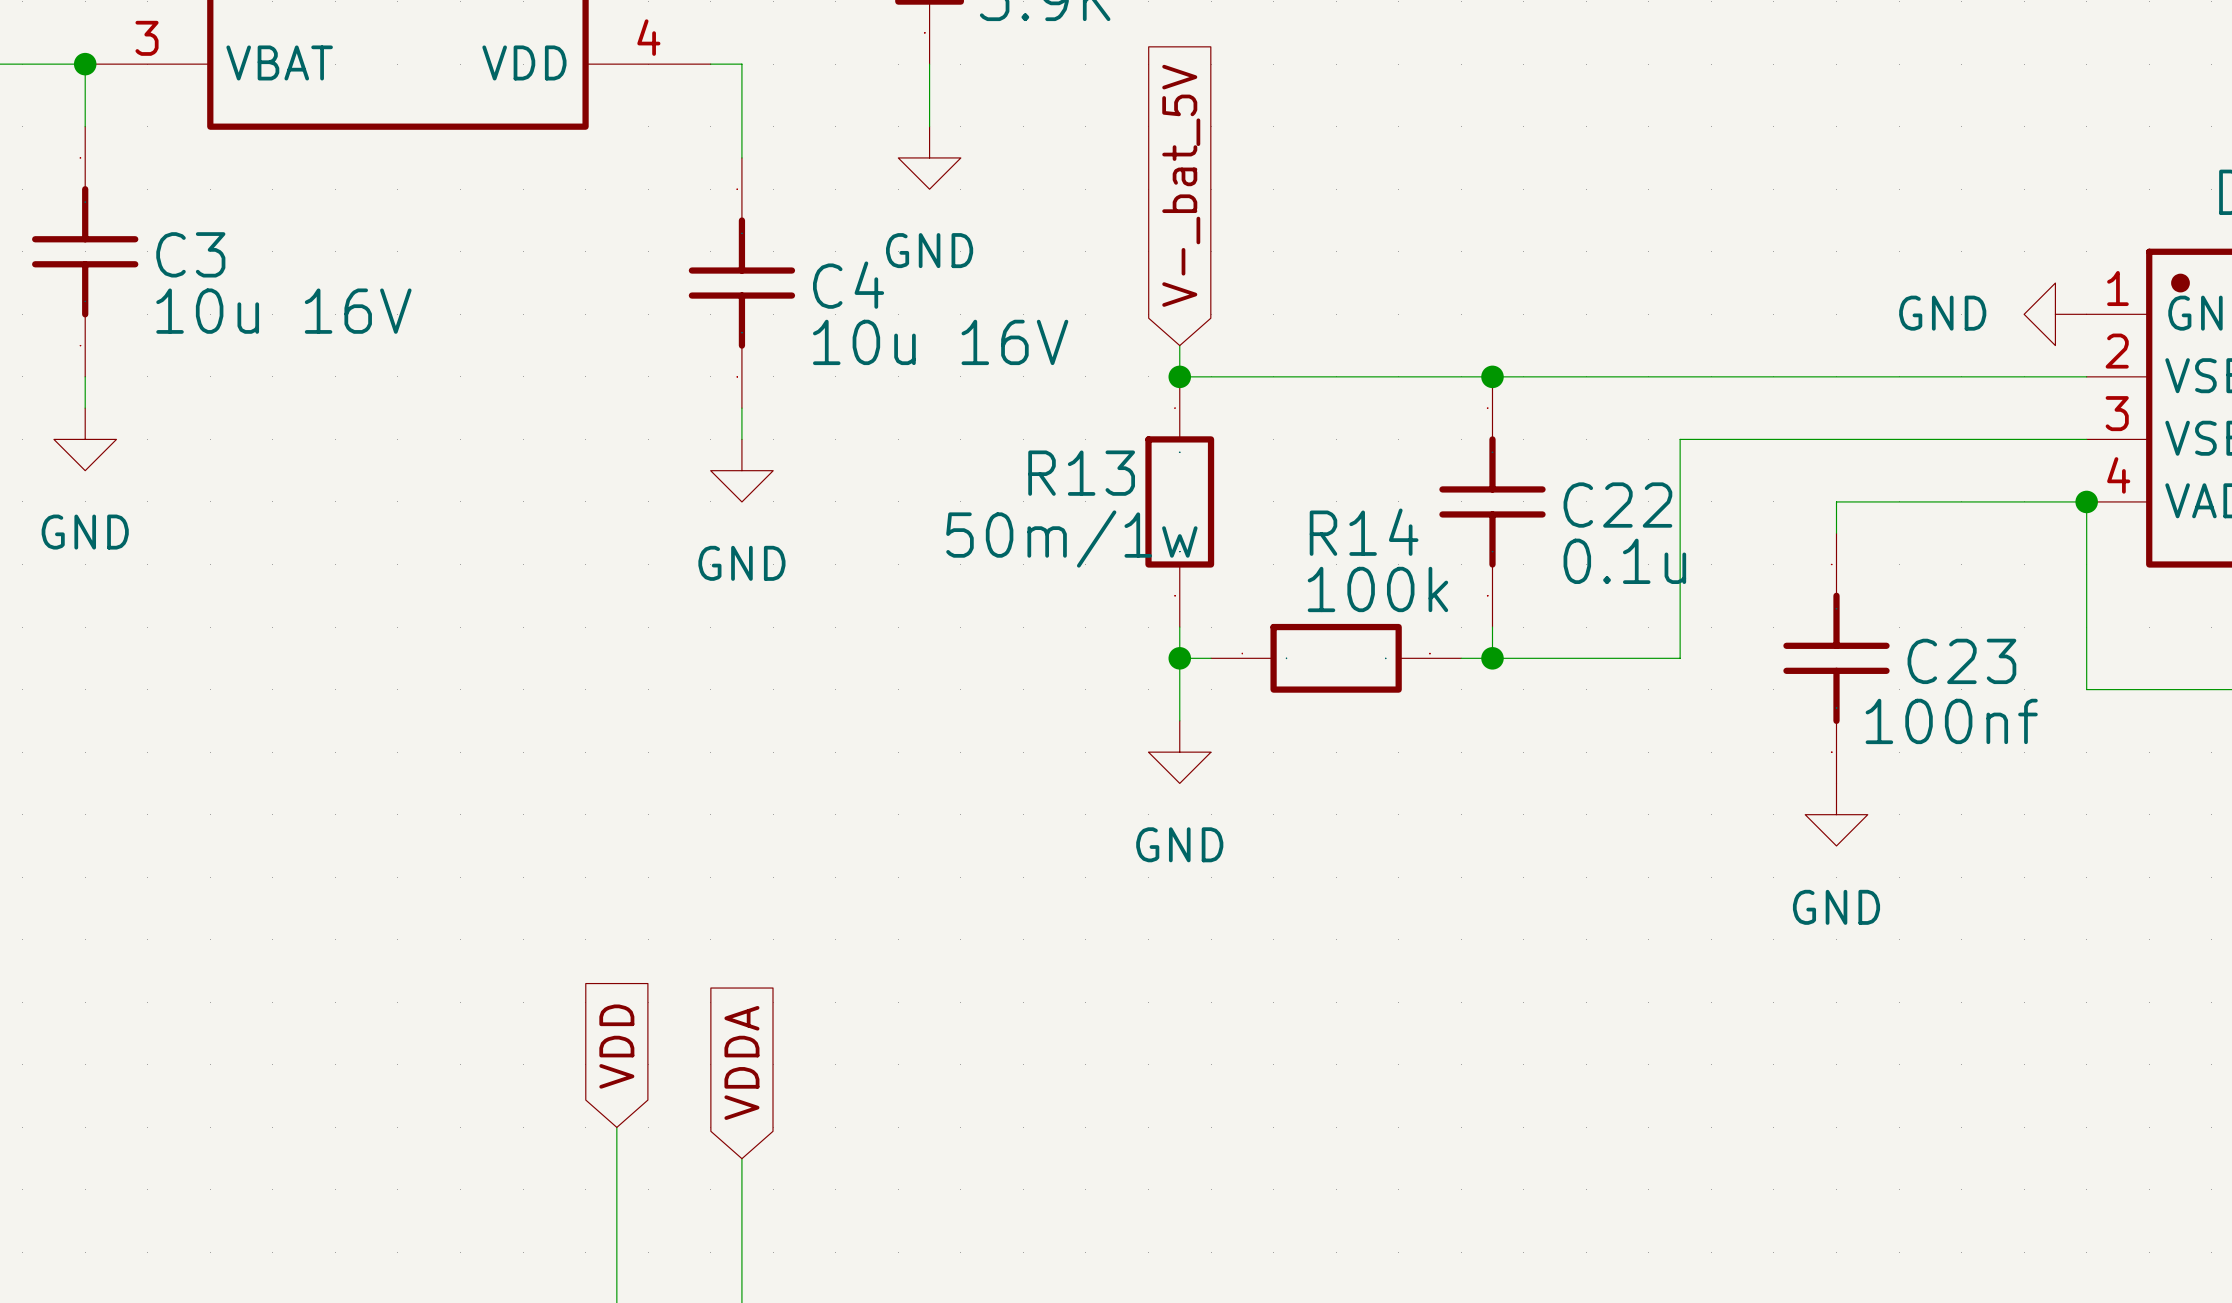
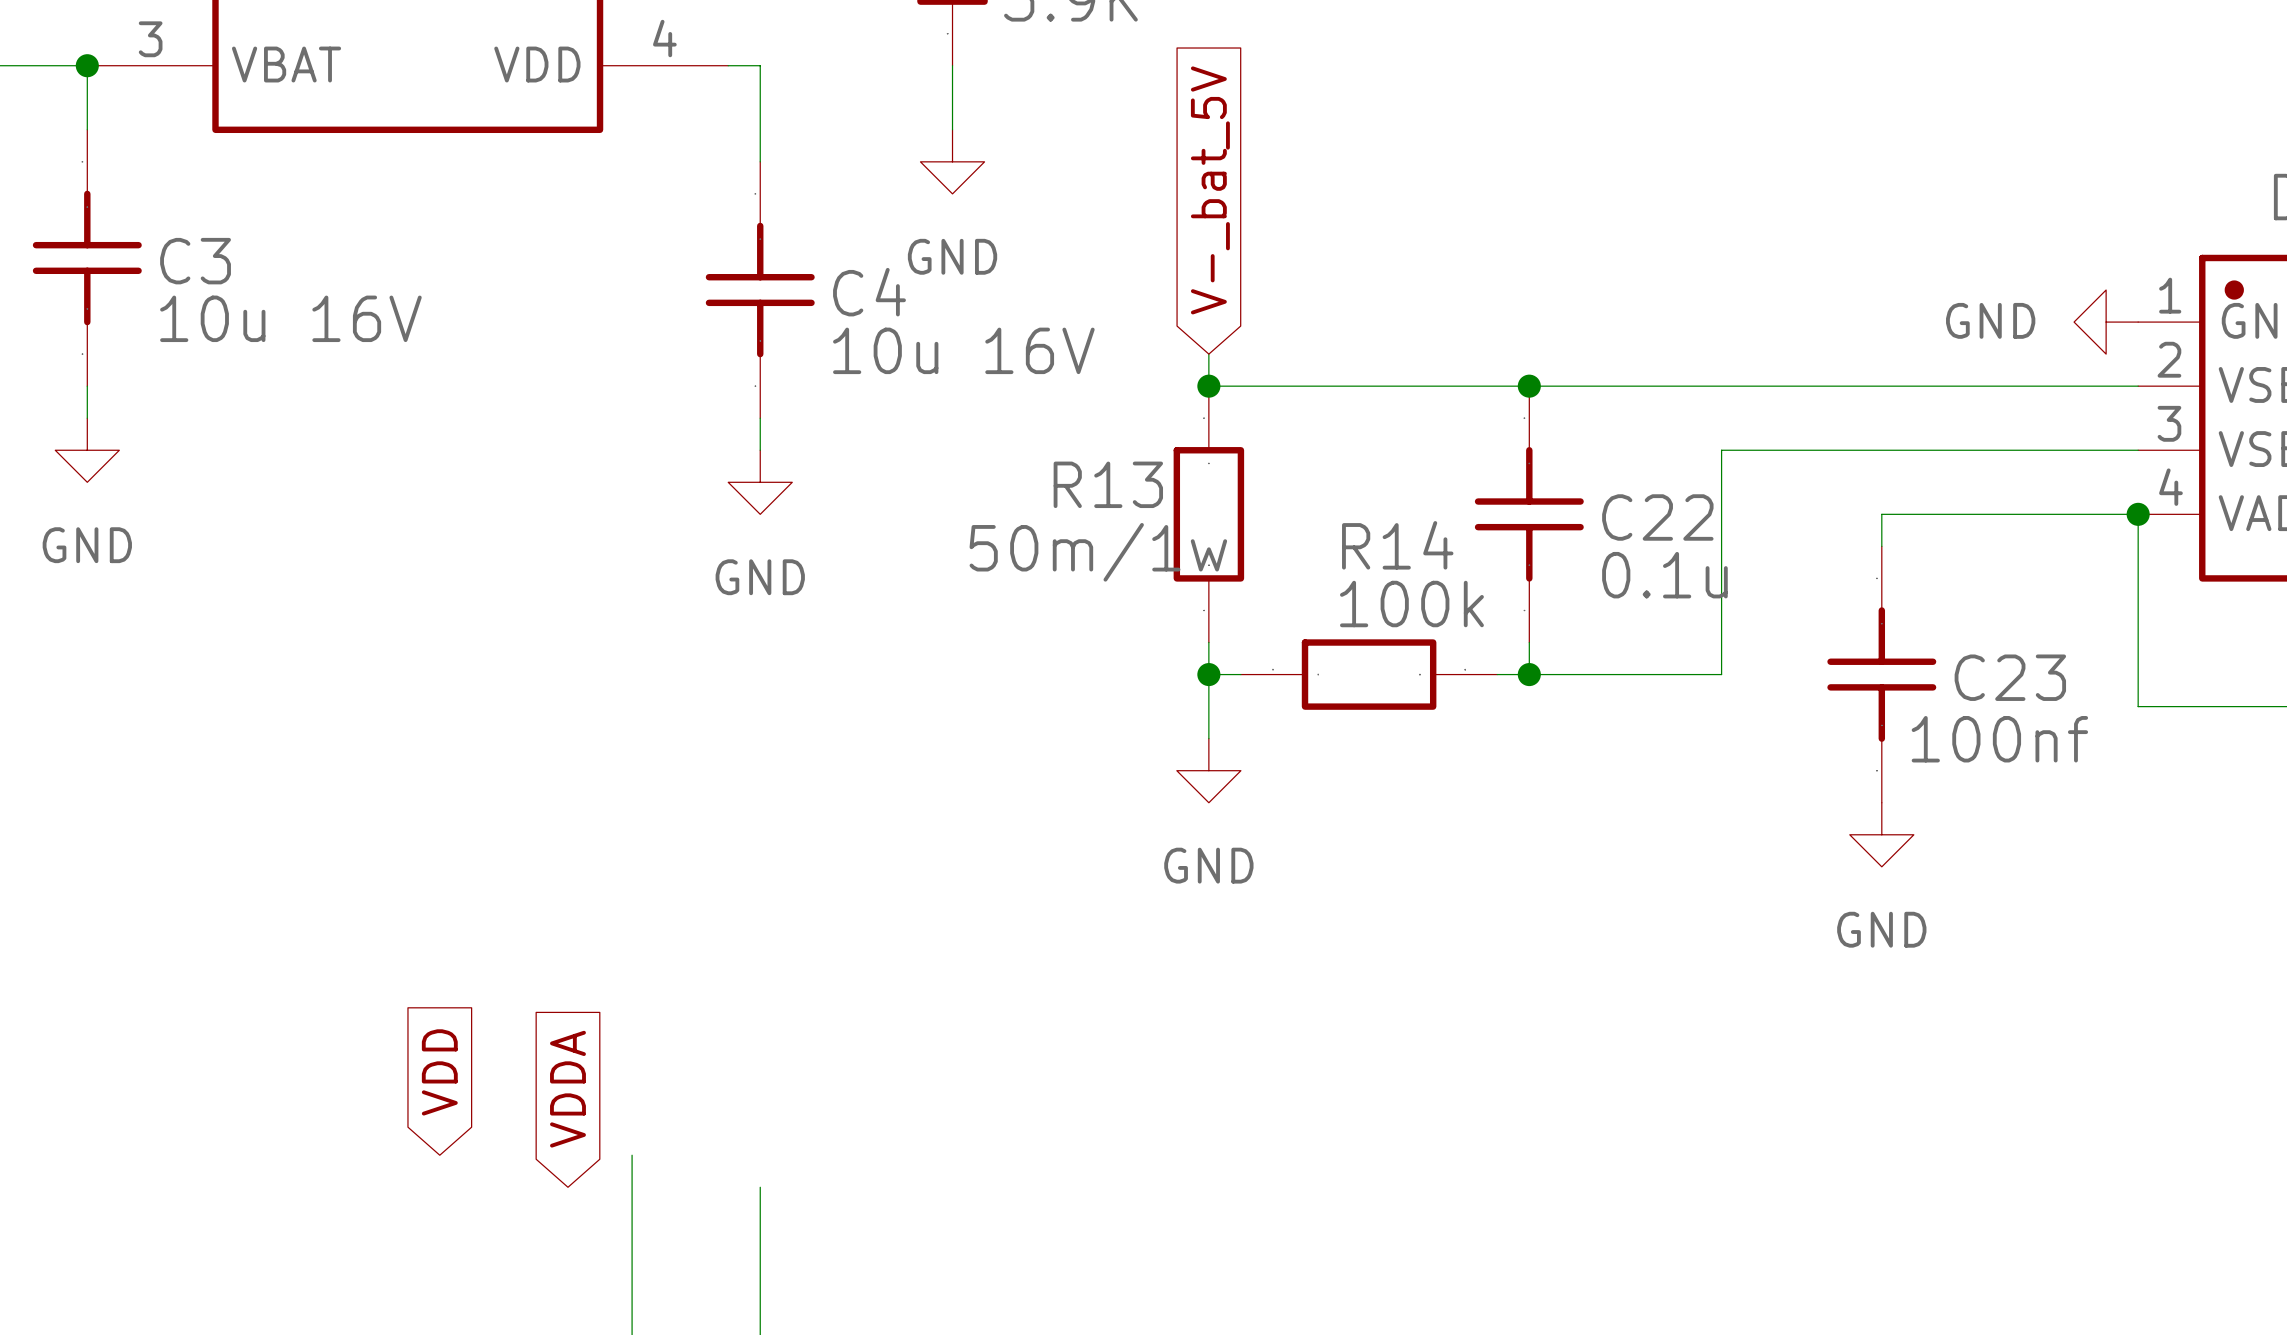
global label position: VDD (616, 1046) -> VDD (439, 1072)
global label position: VDDA (741, 1062) -> VDDA (567, 1089)

